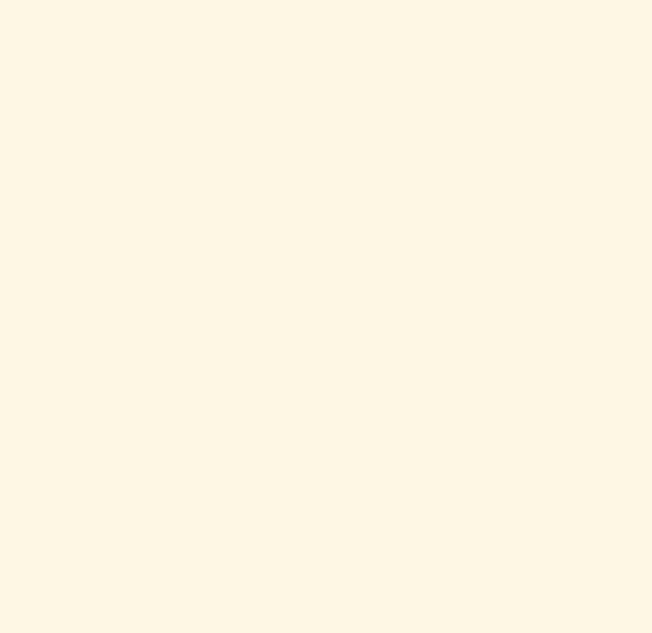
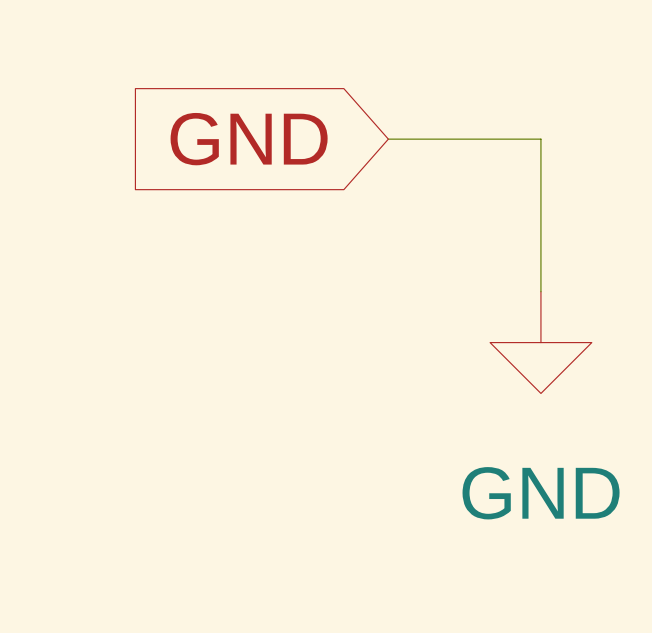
global label: none -> GND (249, 139)
wire: none -> (388, 139) (540, 139) (540, 291)
power symbol: none -> GND (540, 342)

